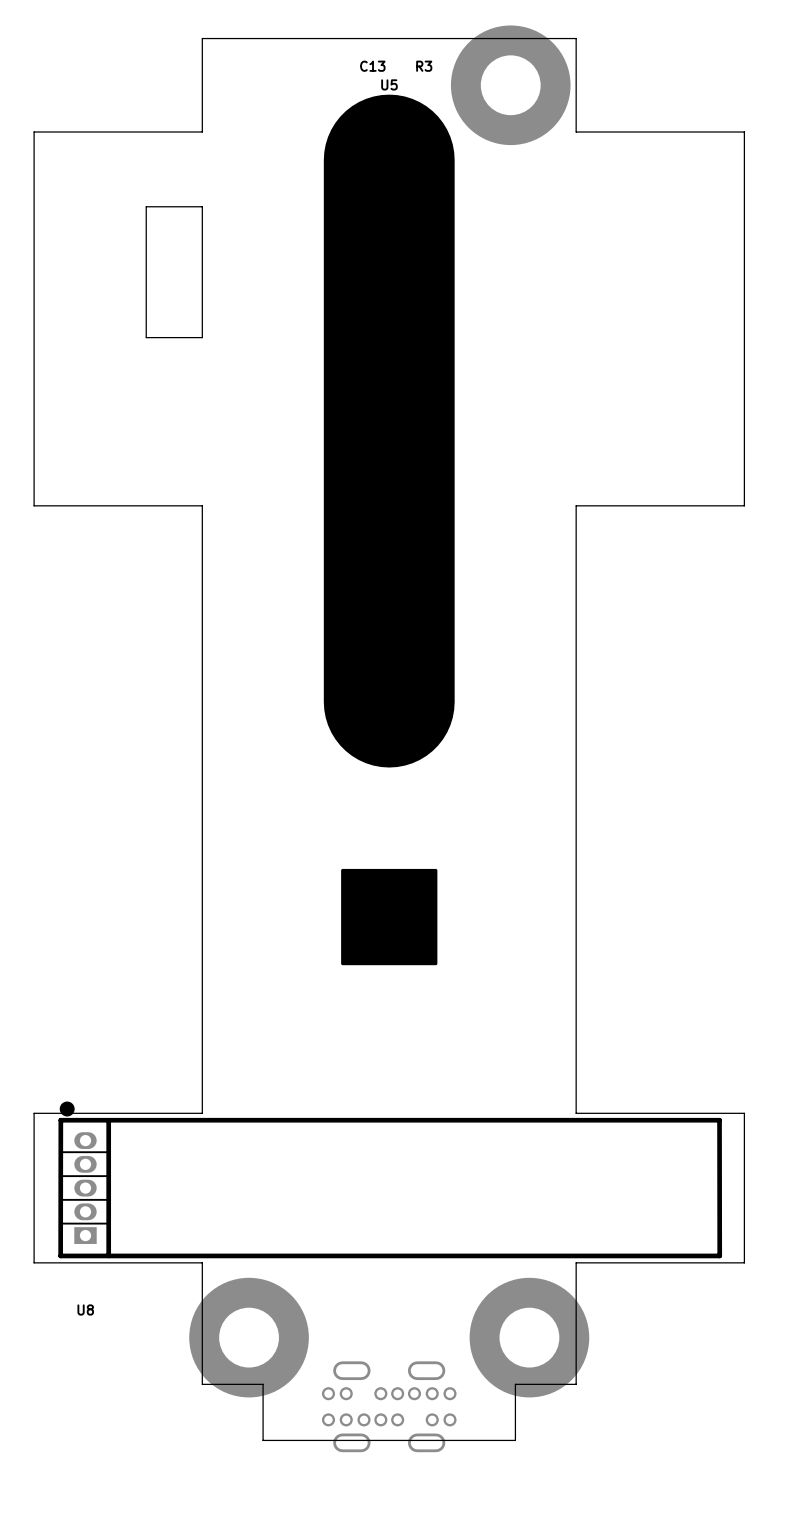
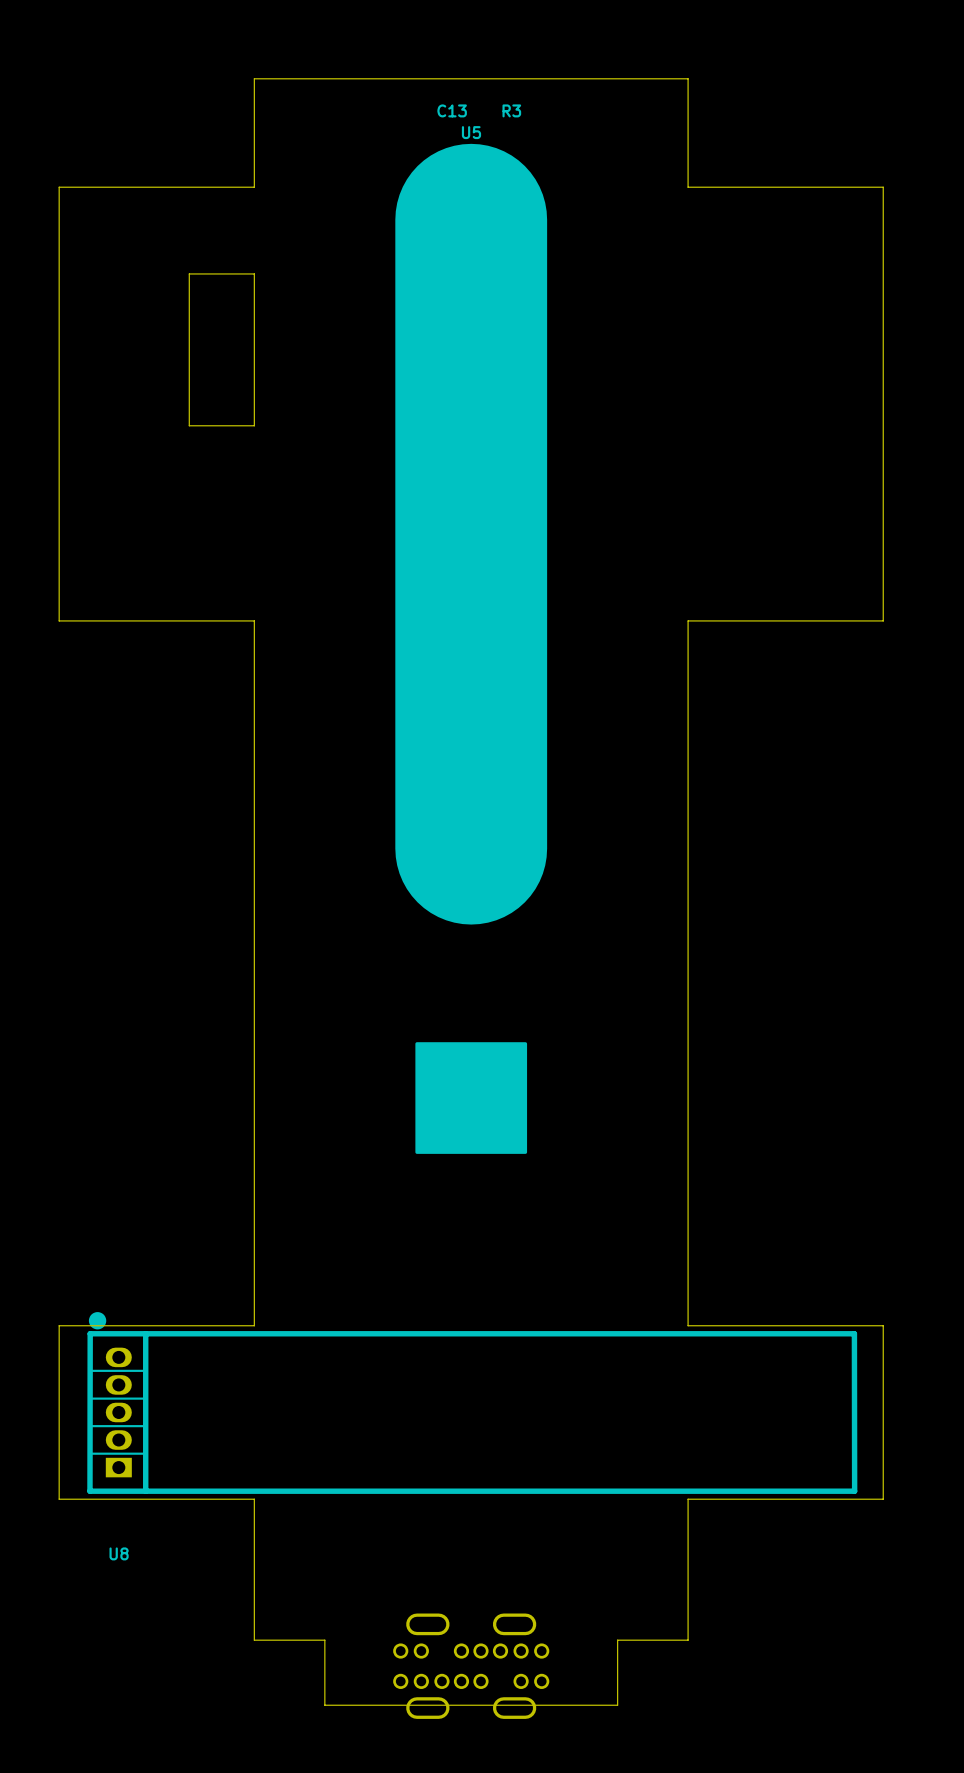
part: (510, 85) -> none
part: (249, 1337) -> none
part: (529, 1337) -> none

